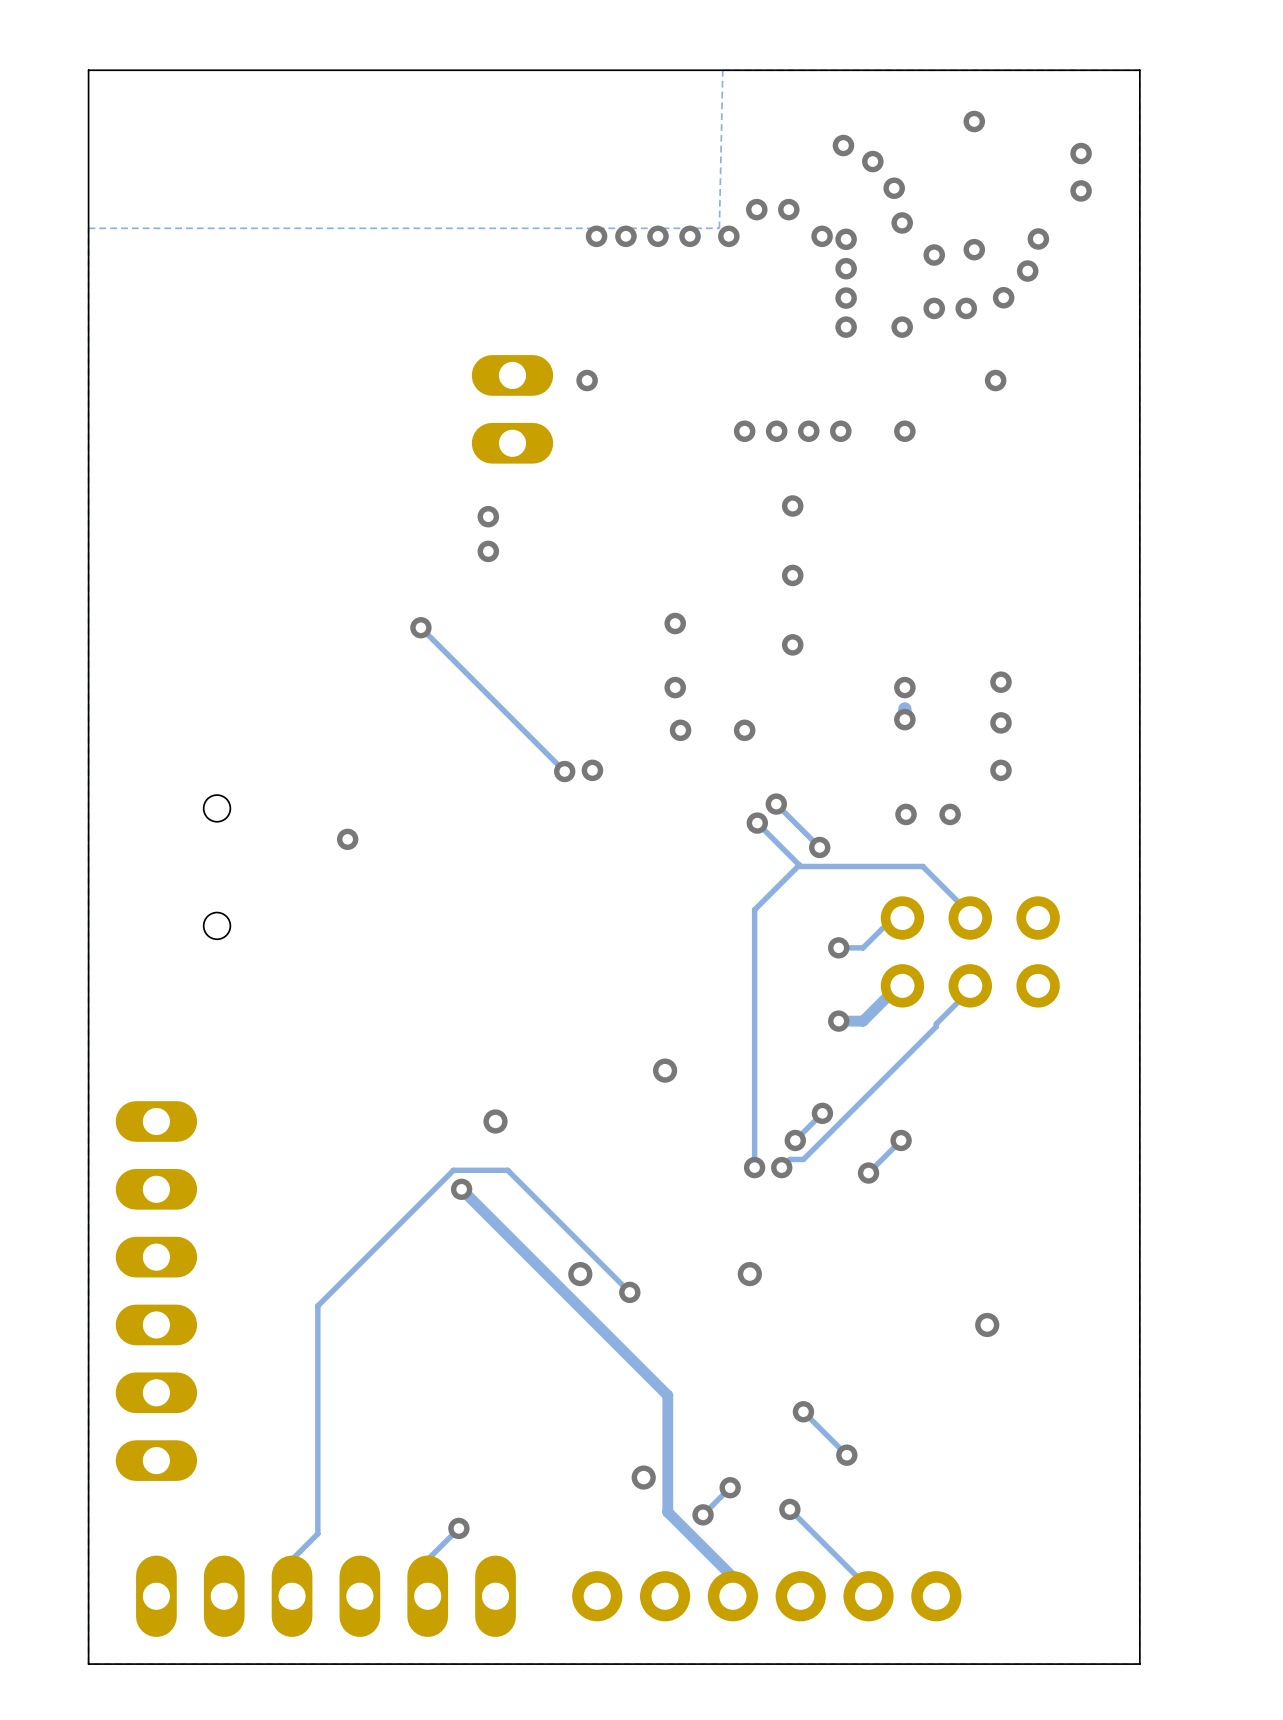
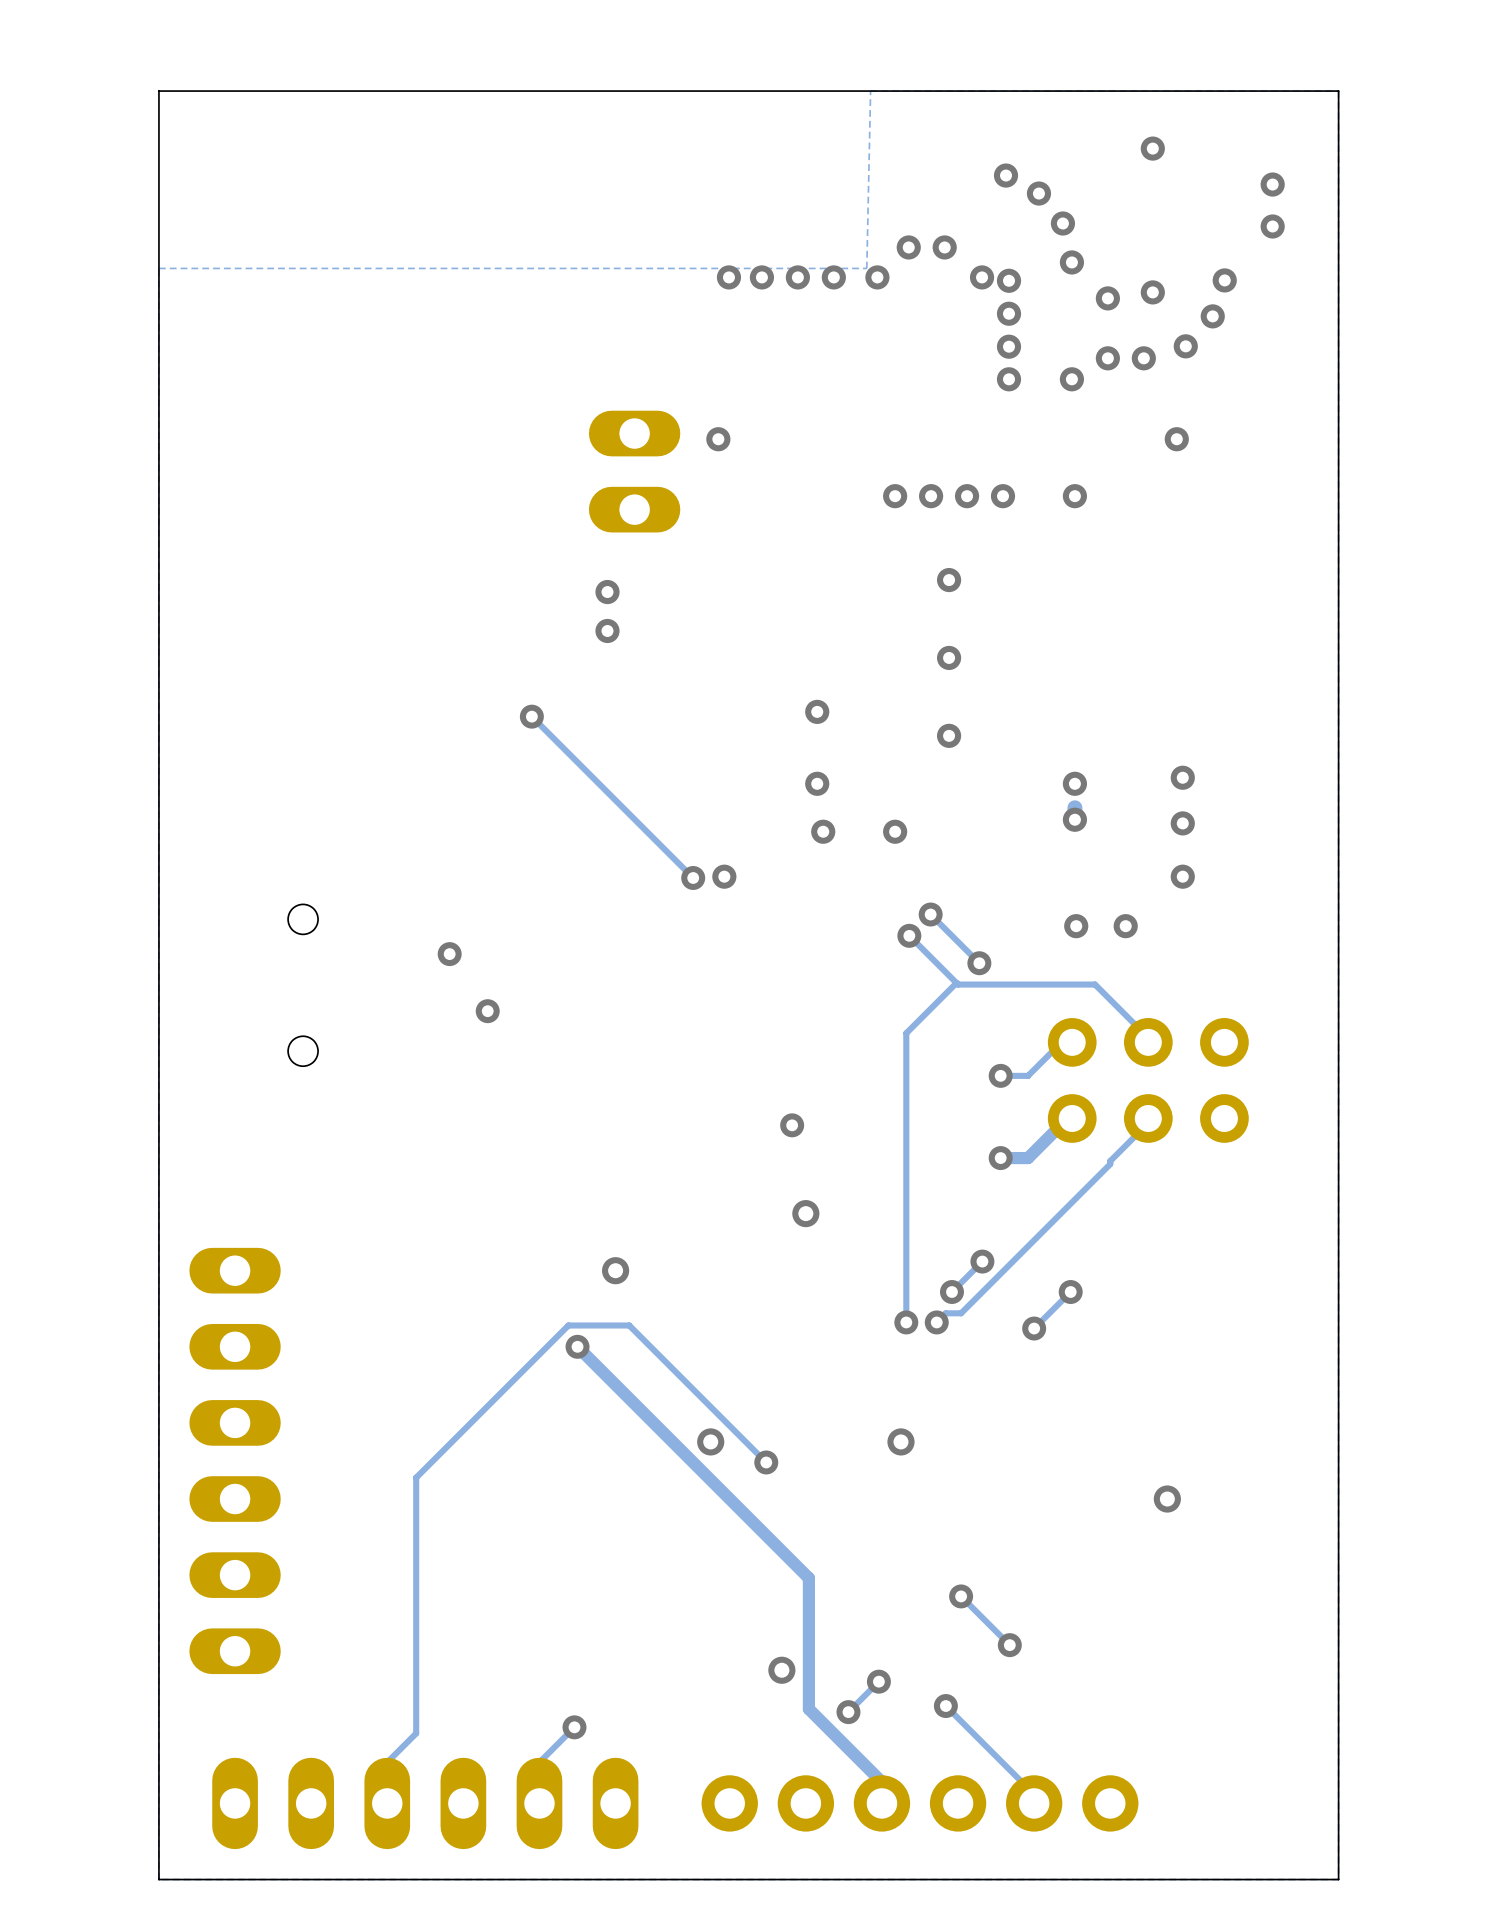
via: none -> (487, 1011)
via: none -> (792, 1125)

